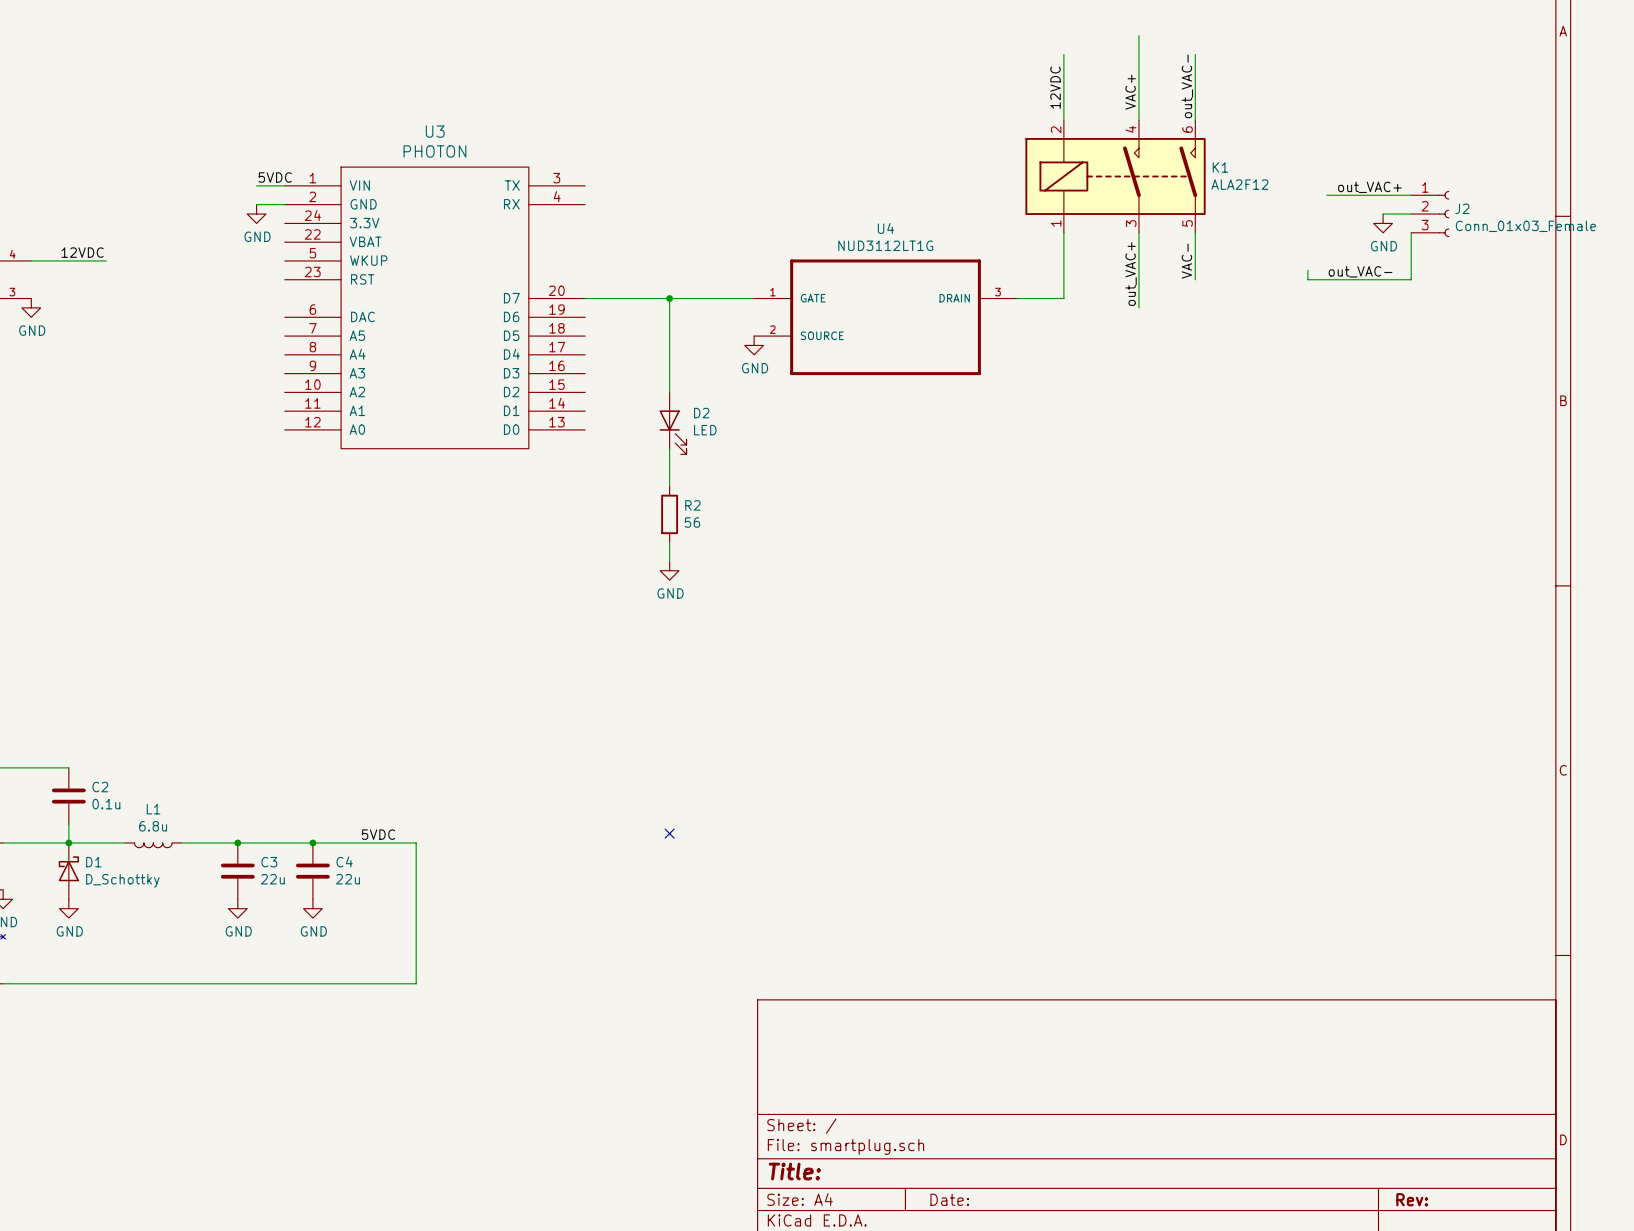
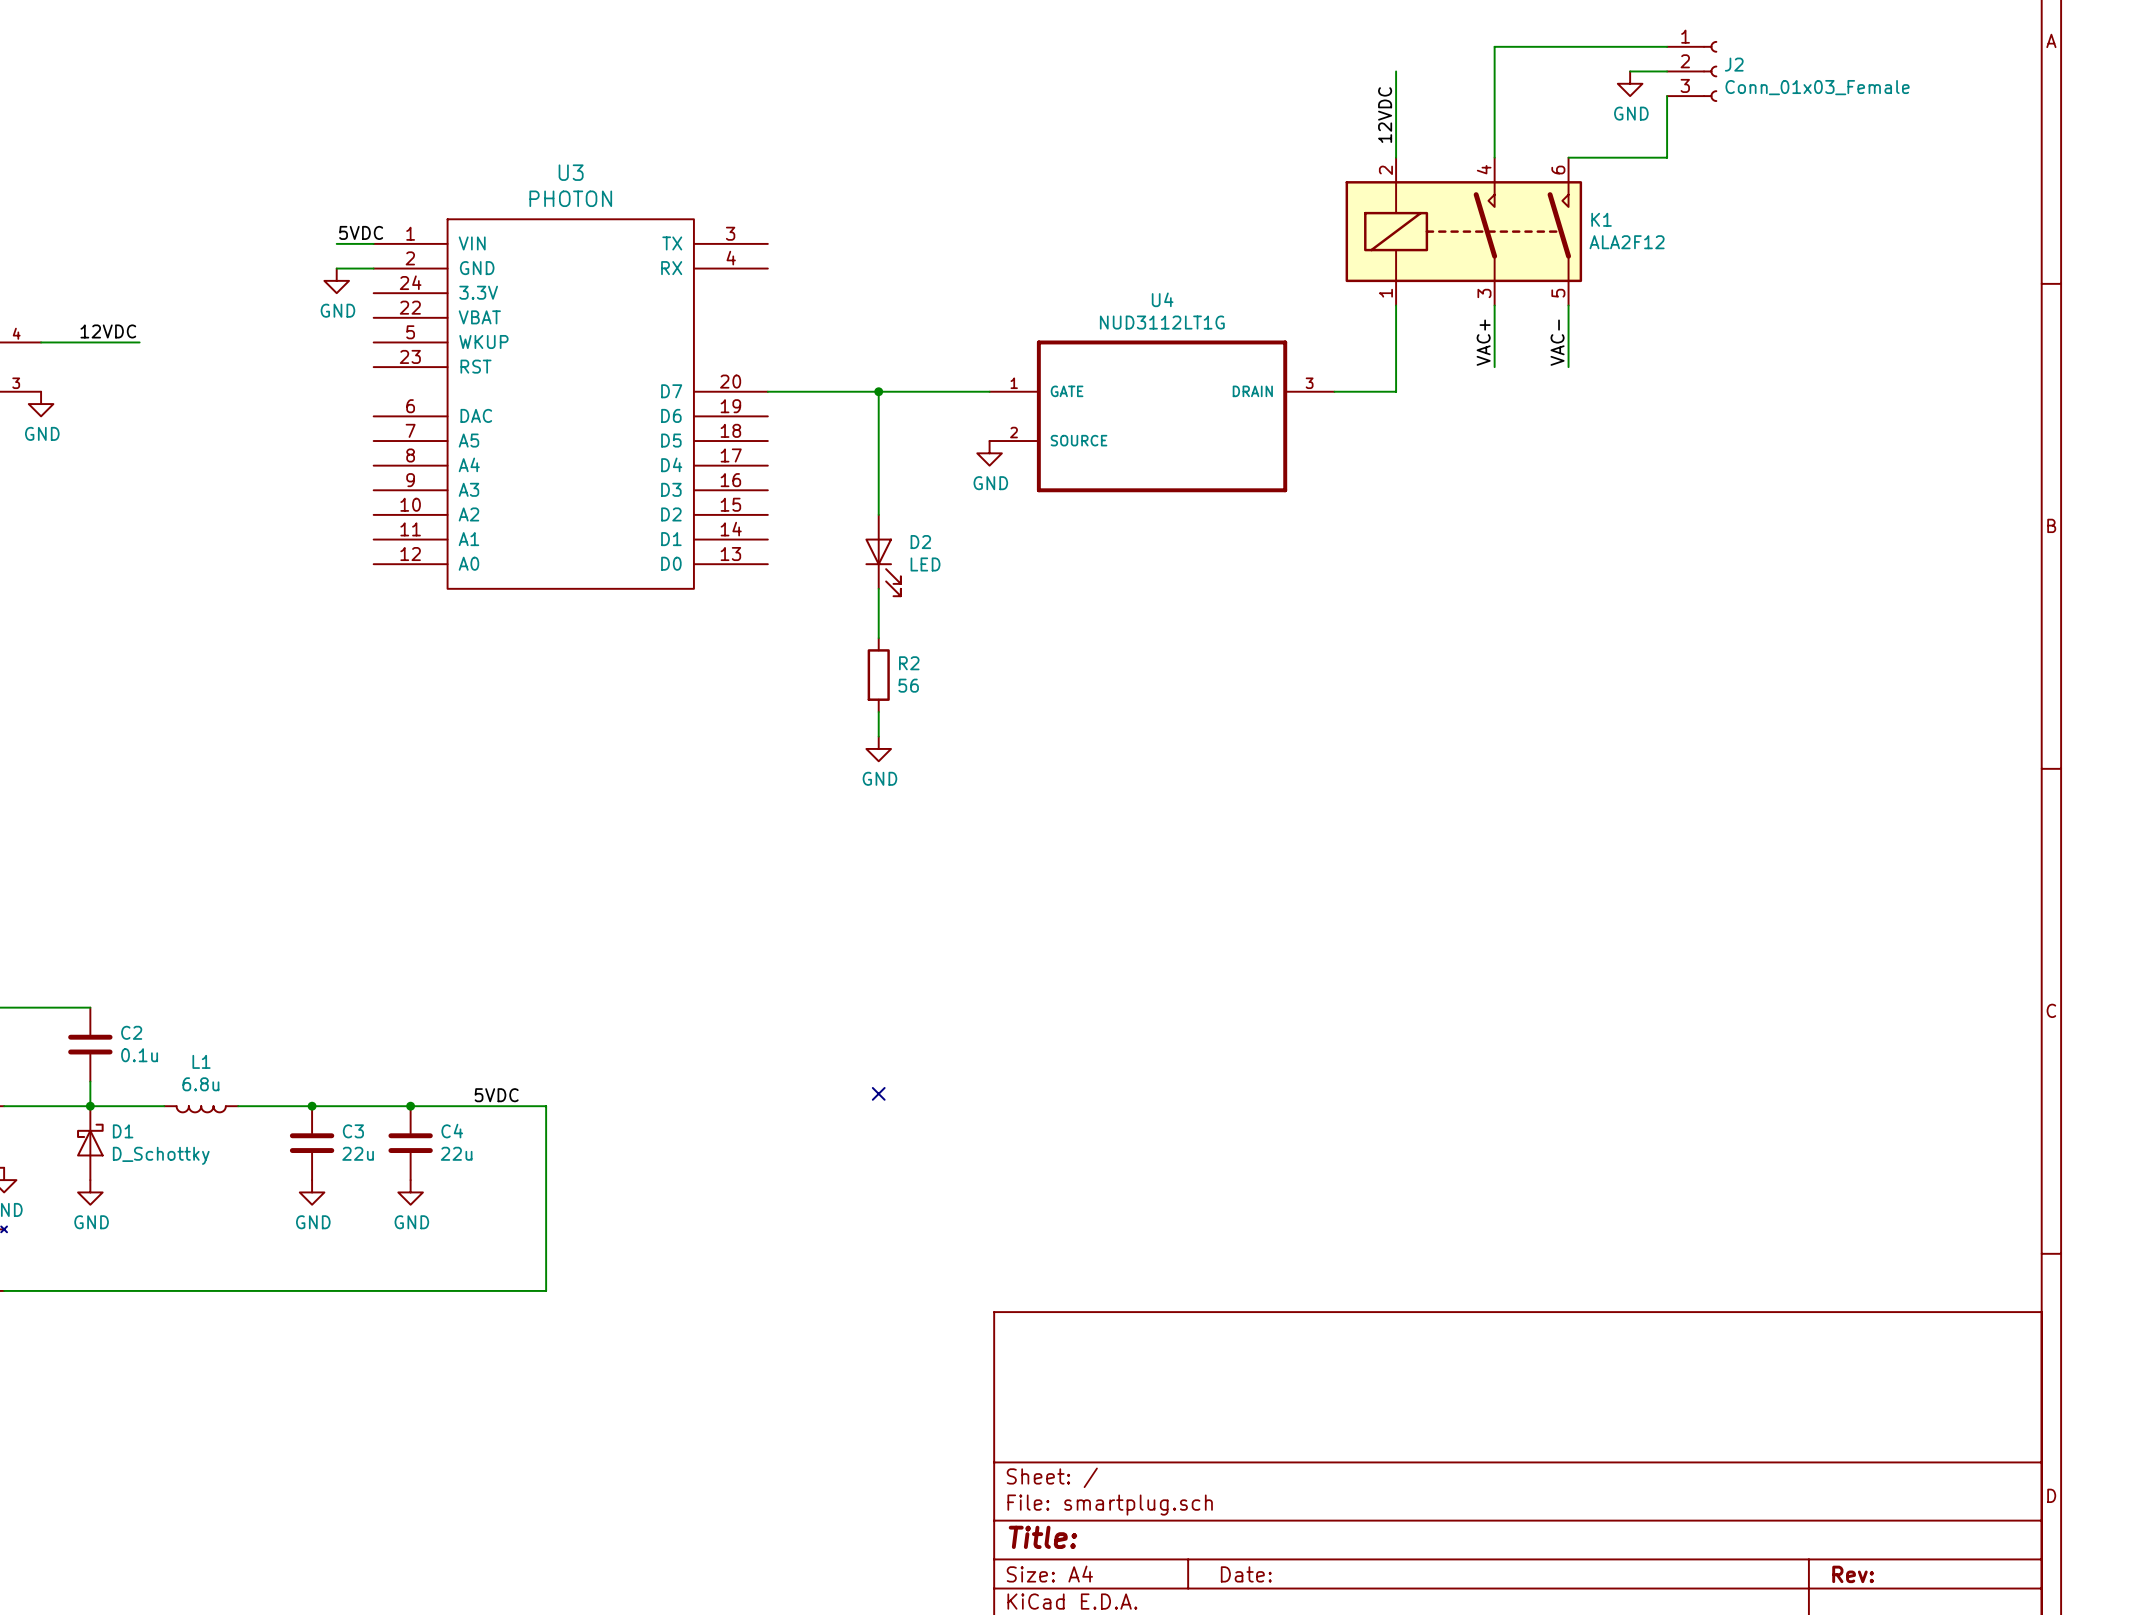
wire: none -> (1494, 46) (1667, 46)
wire: (1195, 54) (1195, 120) -> (1667, 96) (1667, 157) (1568, 157)
wire: none -> (1630, 71) (1667, 71)
power symbol: none -> GND (1630, 83)
label: out_VAC- (1187, 86) -> none
label position: VAC+ (1130, 92) -> VAC+ (1483, 342)
label: out_VAC+ (1369, 187) -> none
wire: (1326, 195) (1411, 195) -> none
wire: (1383, 214) (1411, 214) -> none
J2 position: (1430, 214) -> (1692, 71)
power symbol: GND (1383, 223) -> none
wire: (1411, 232) (1411, 279) (1307, 279) (1307, 270) -> none
label: out_VAC- (1360, 271) -> none
label: out_VAC+ (1131, 274) -> none
wire: (1138, 279) (1138, 307) -> none

